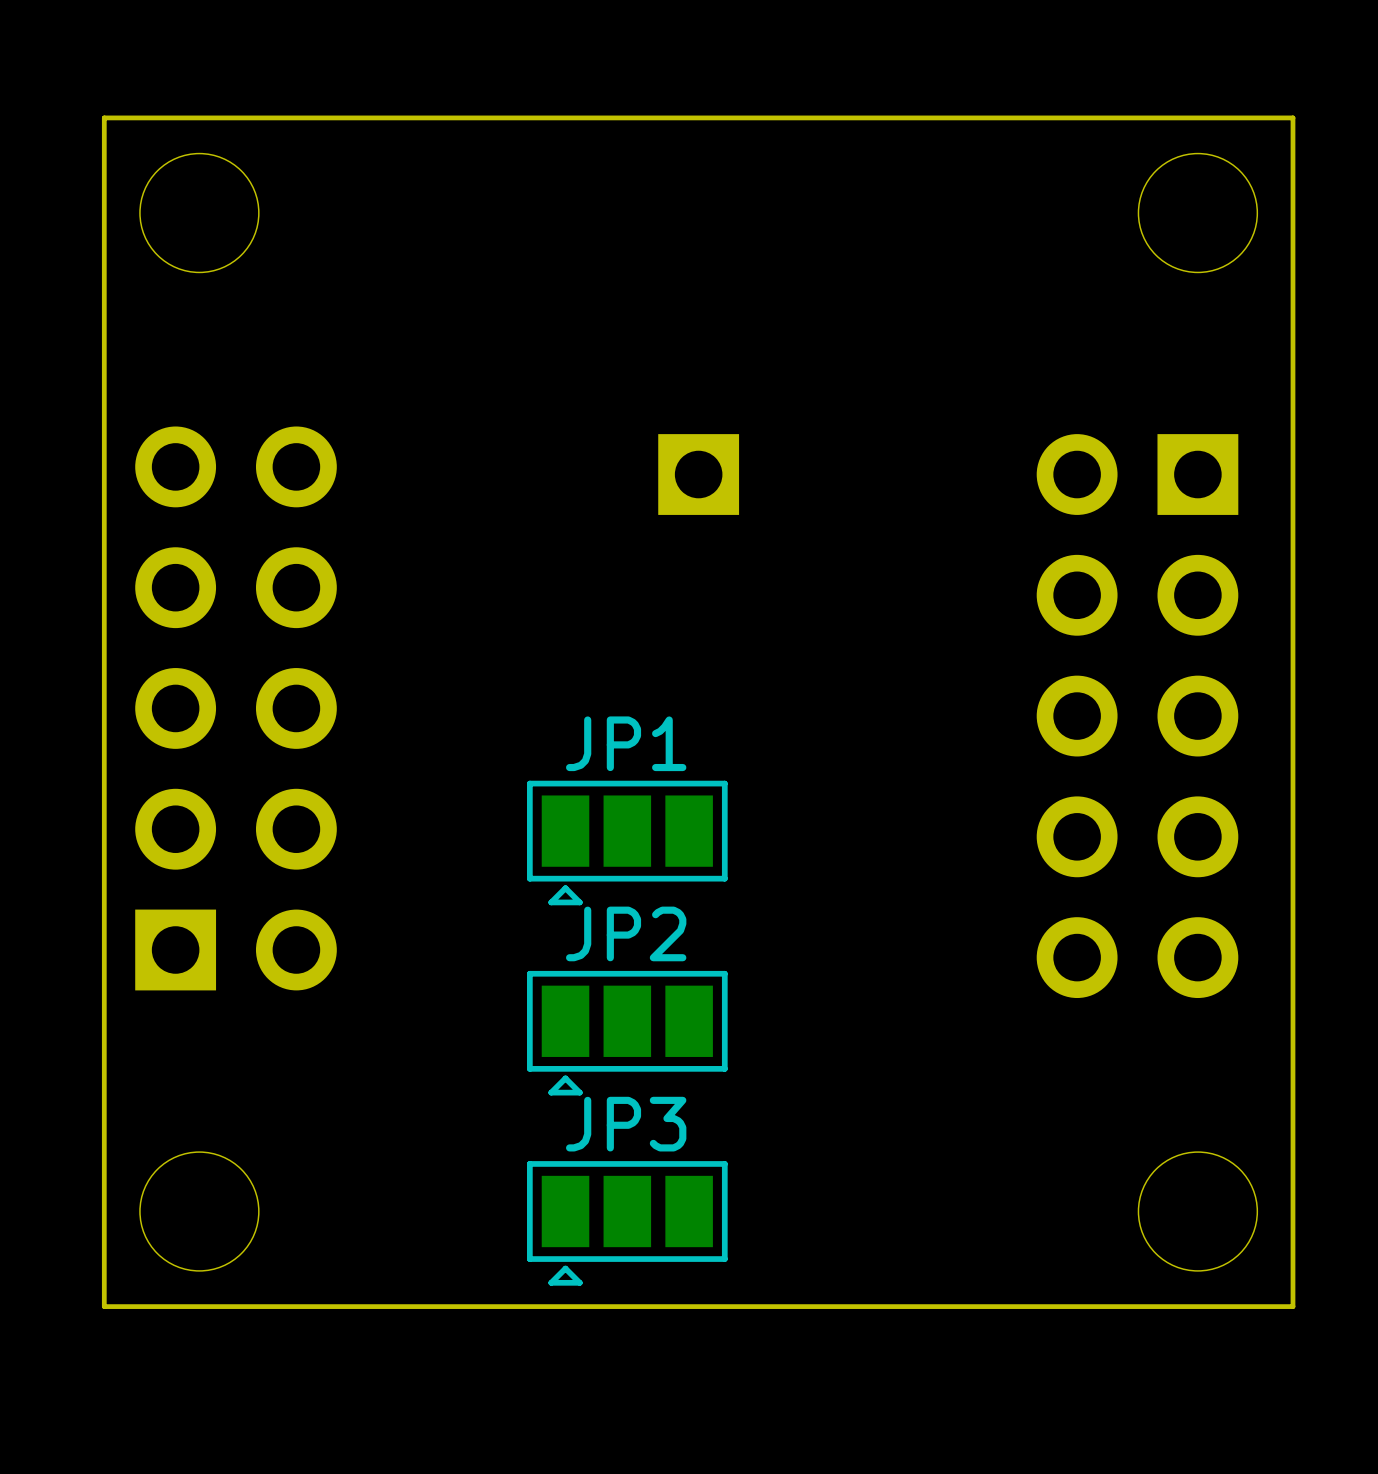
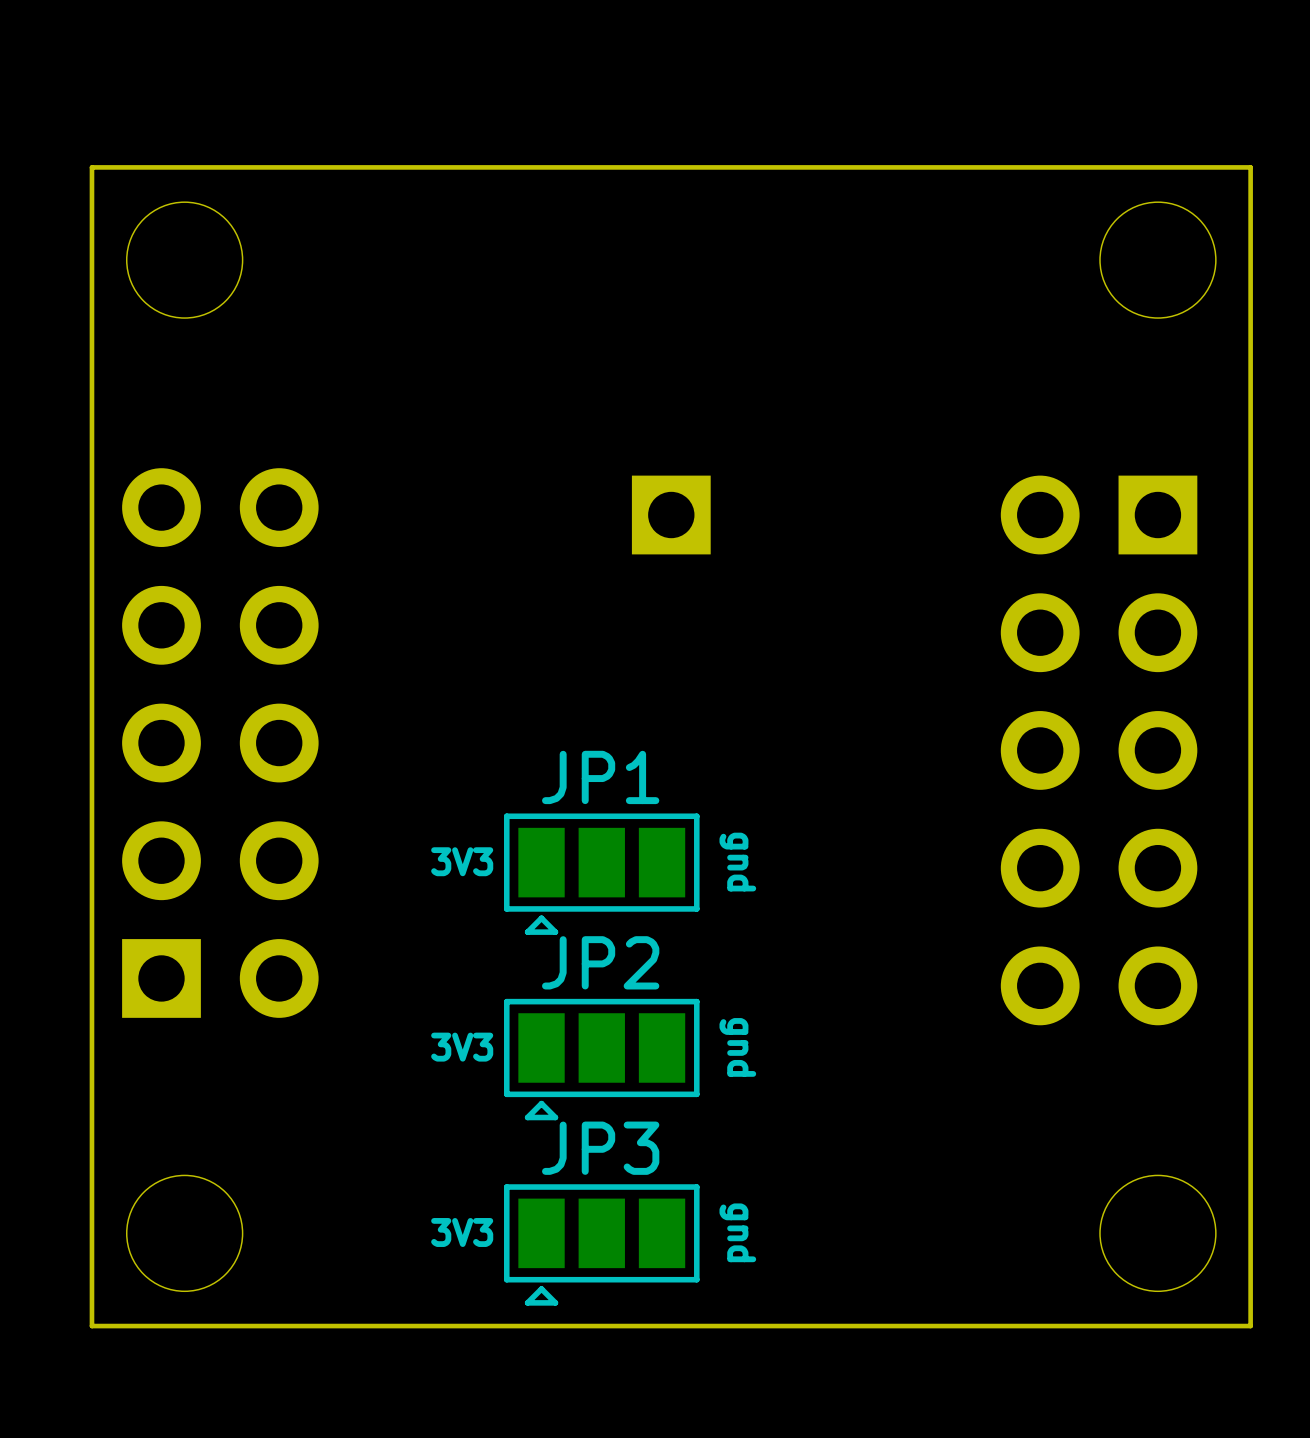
text: none -> 3V3 (462, 861)
text: none -> gnd (737, 862)
text: none -> 3V3 (462, 1047)
text: none -> gnd (737, 1047)
text: none -> 3V3 (462, 1232)
text: none -> gnd (737, 1232)

